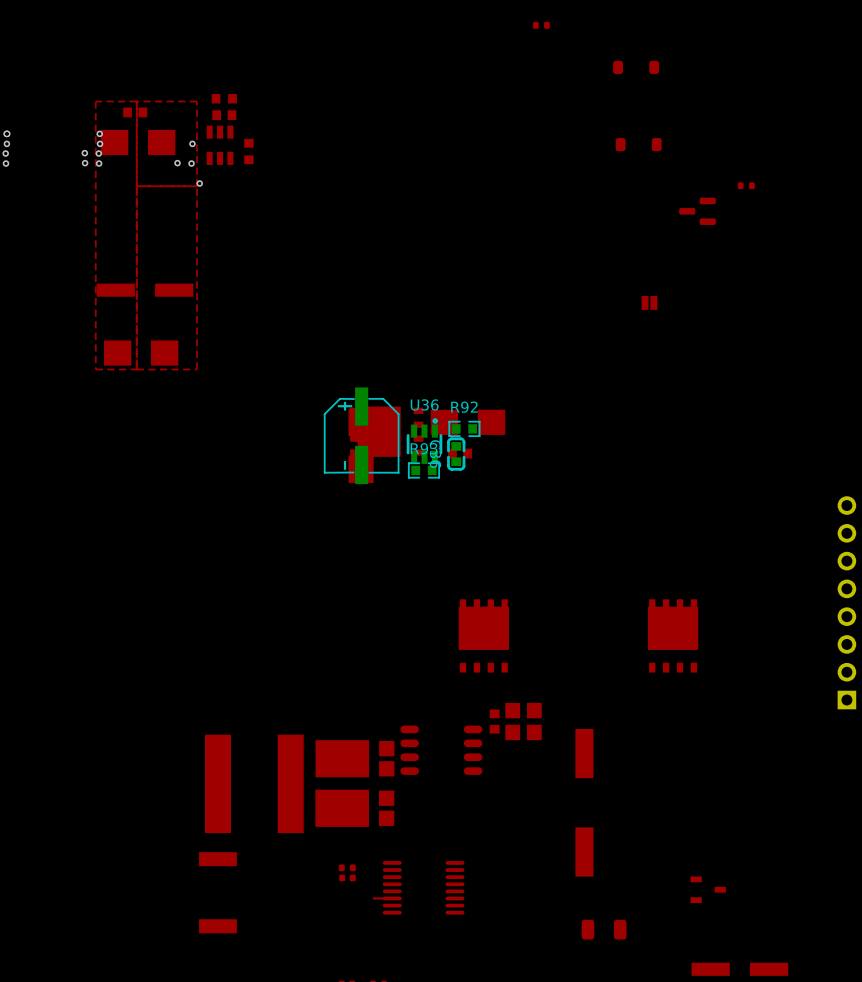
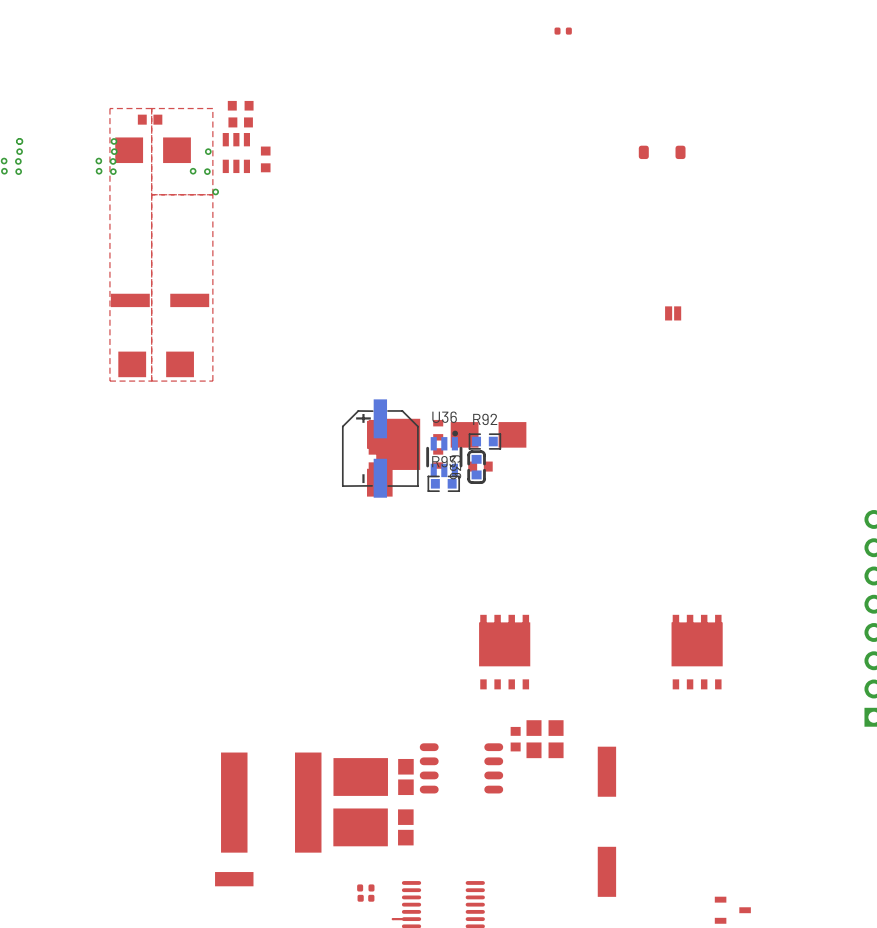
part: (636, 67) -> none
part: (746, 185) -> none
part: (697, 211) -> none

